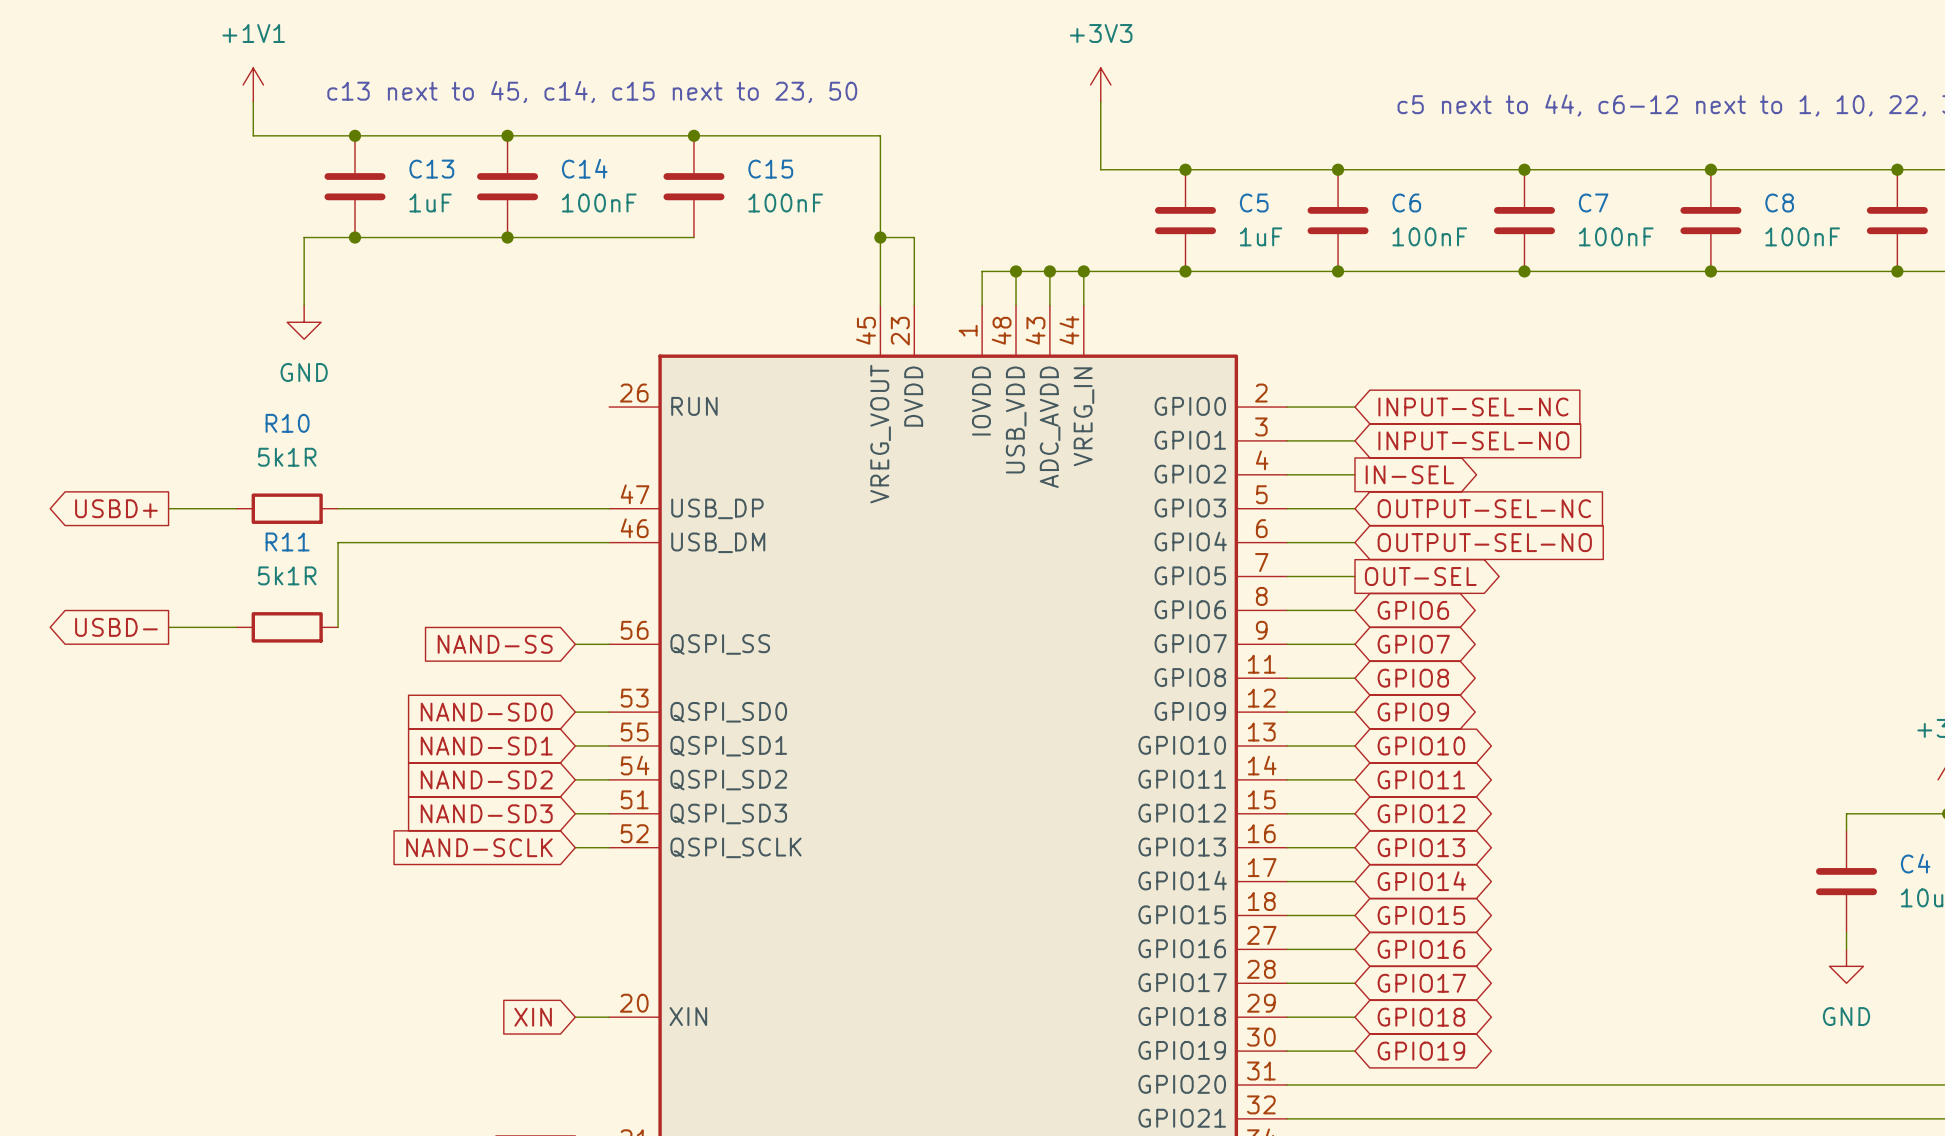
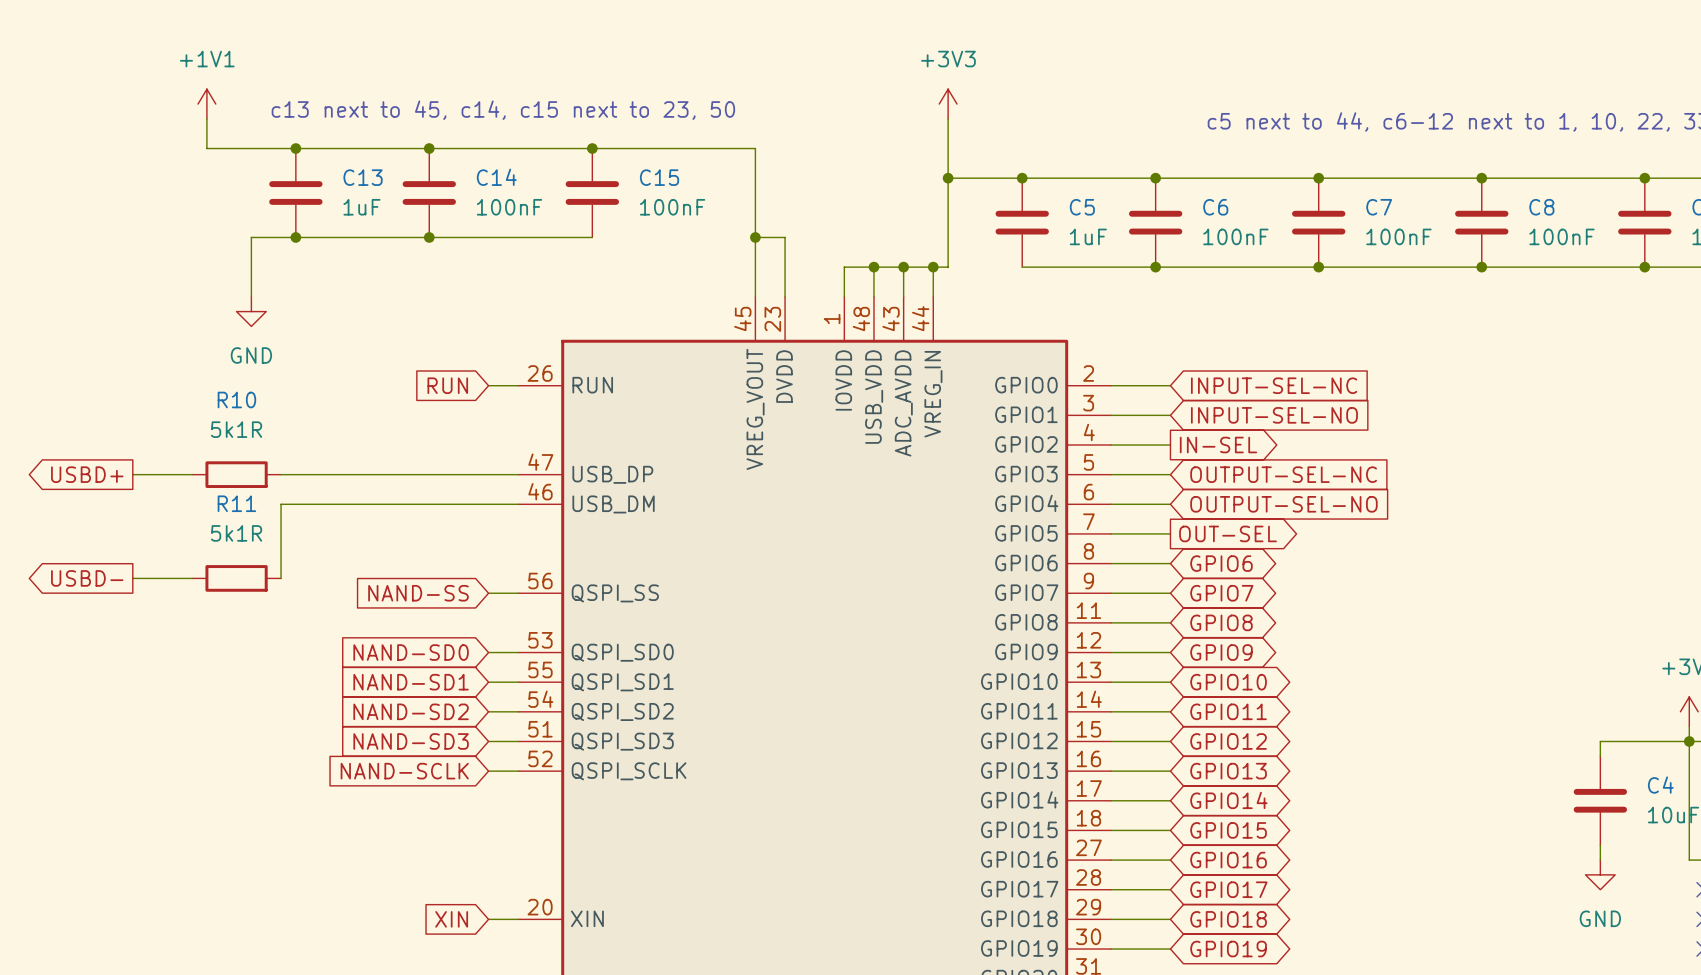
junction: none -> (948, 178)
wire: (1100, 271) (1185, 271) -> (948, 267) (948, 178)
junction: (1185, 271) -> none
global label: none -> RUN (447, 385)
wire: none -> (488, 385) (518, 385)

